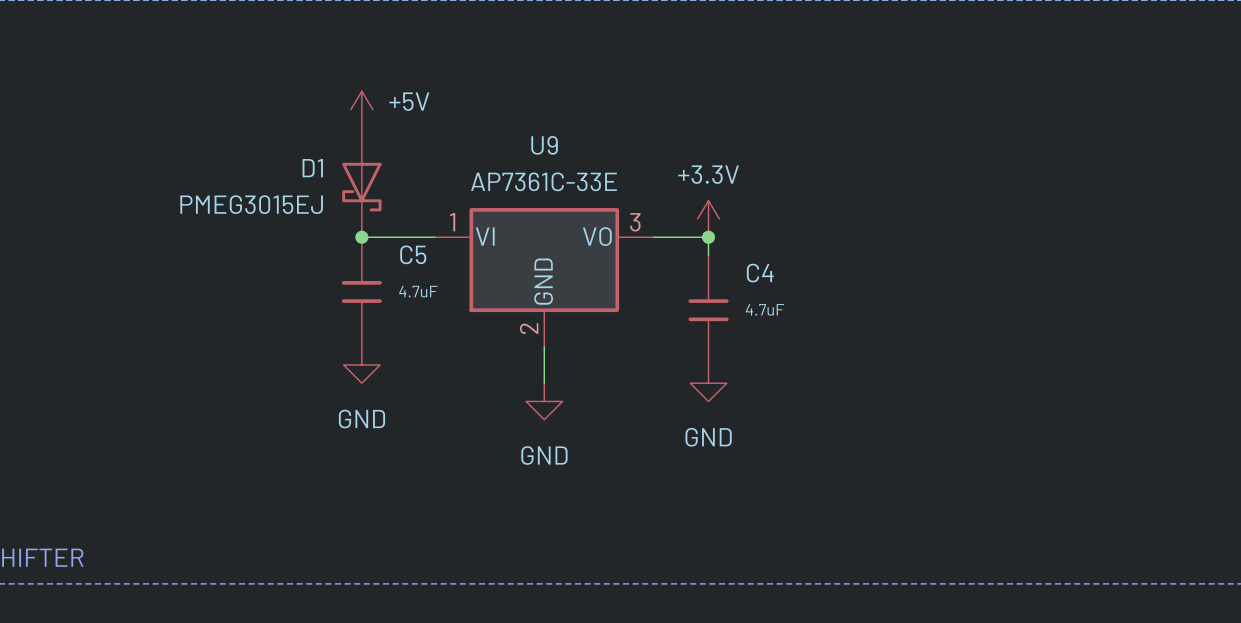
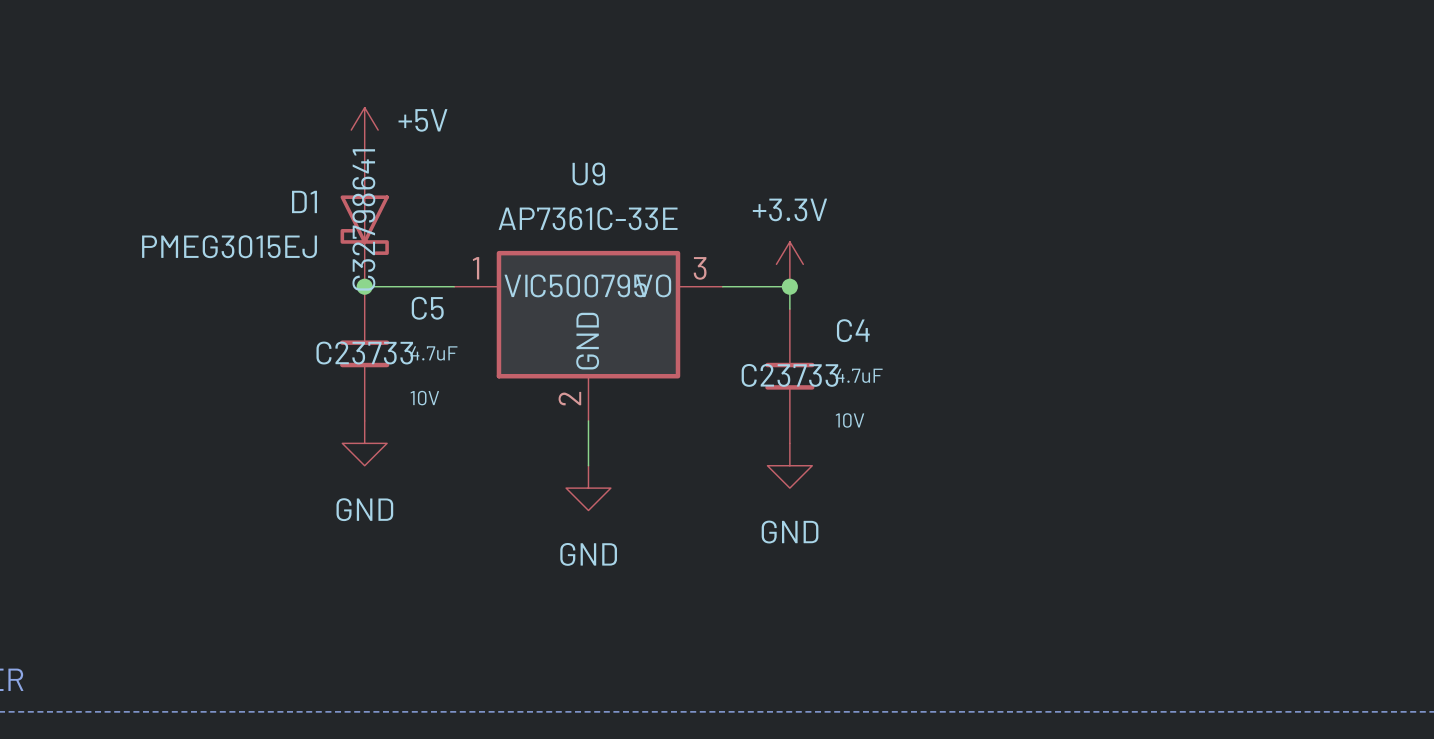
D1 text: none -> C32798641 (363, 219)
U9 text: none -> C500795 (588, 285)
C5 text: none -> C23733 (364, 353)
C4 text: none -> C23733 (789, 375)
C5 text: none -> 10V (424, 398)
C4 text: none -> 10V (850, 420)

